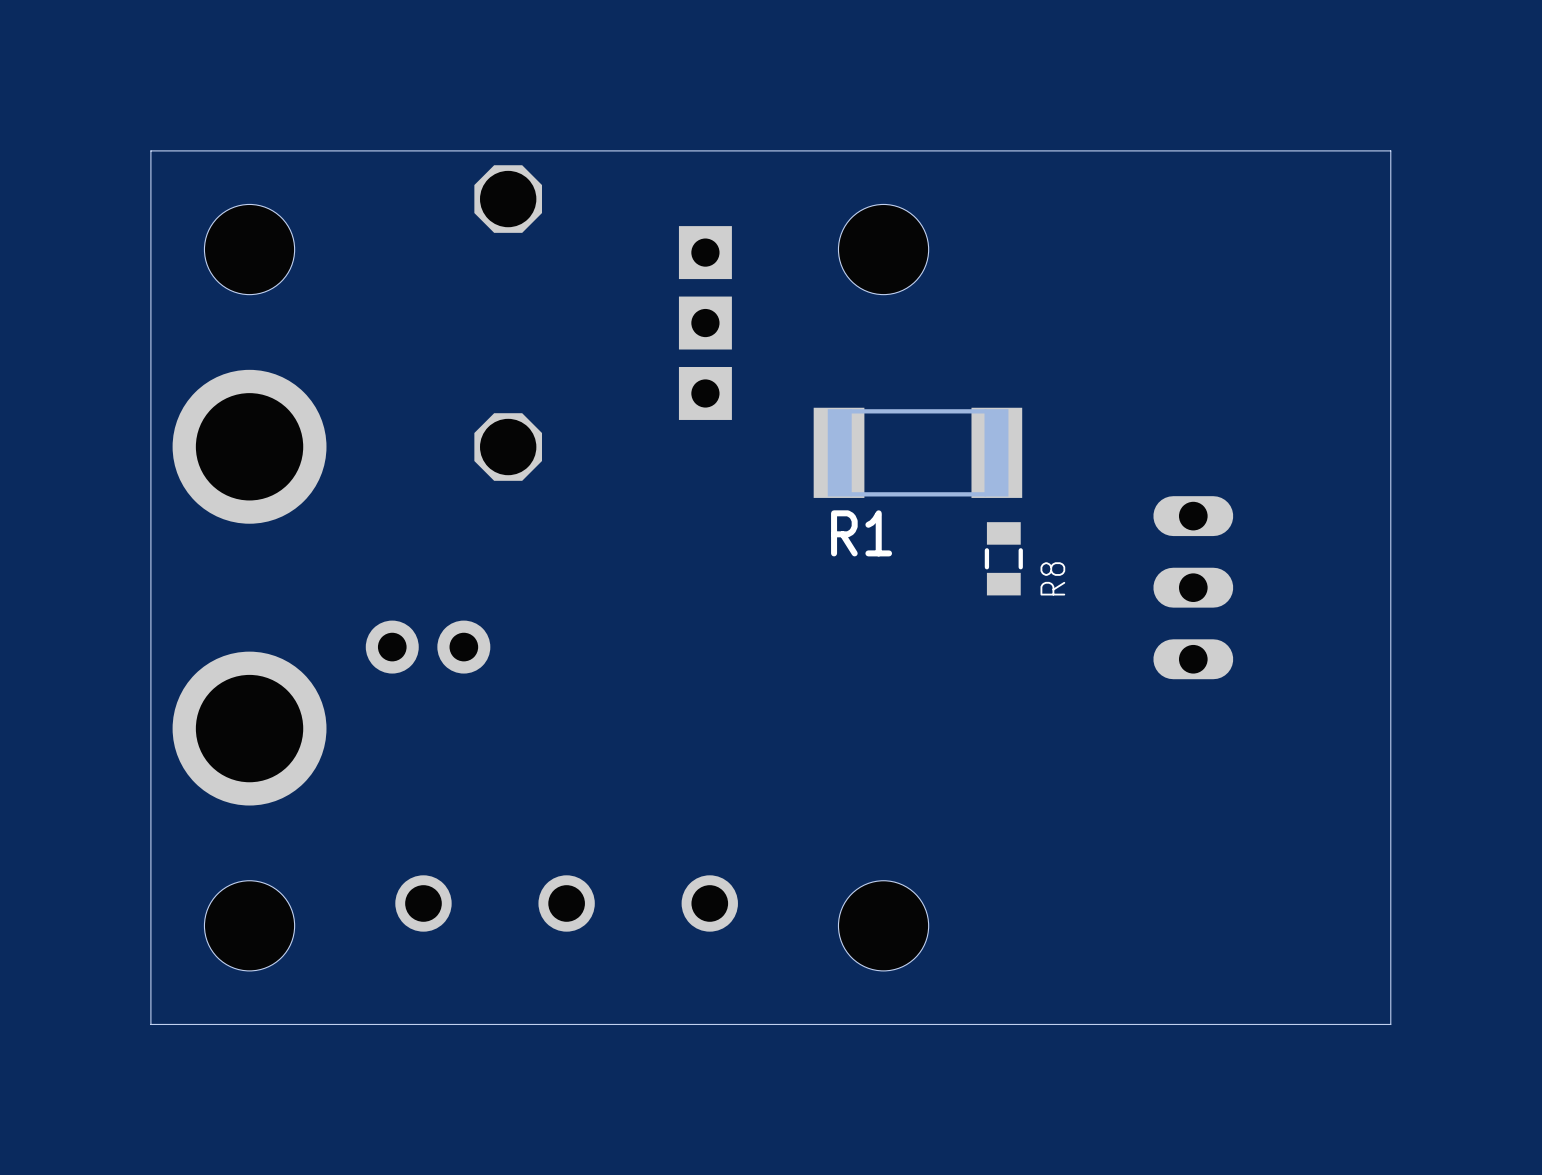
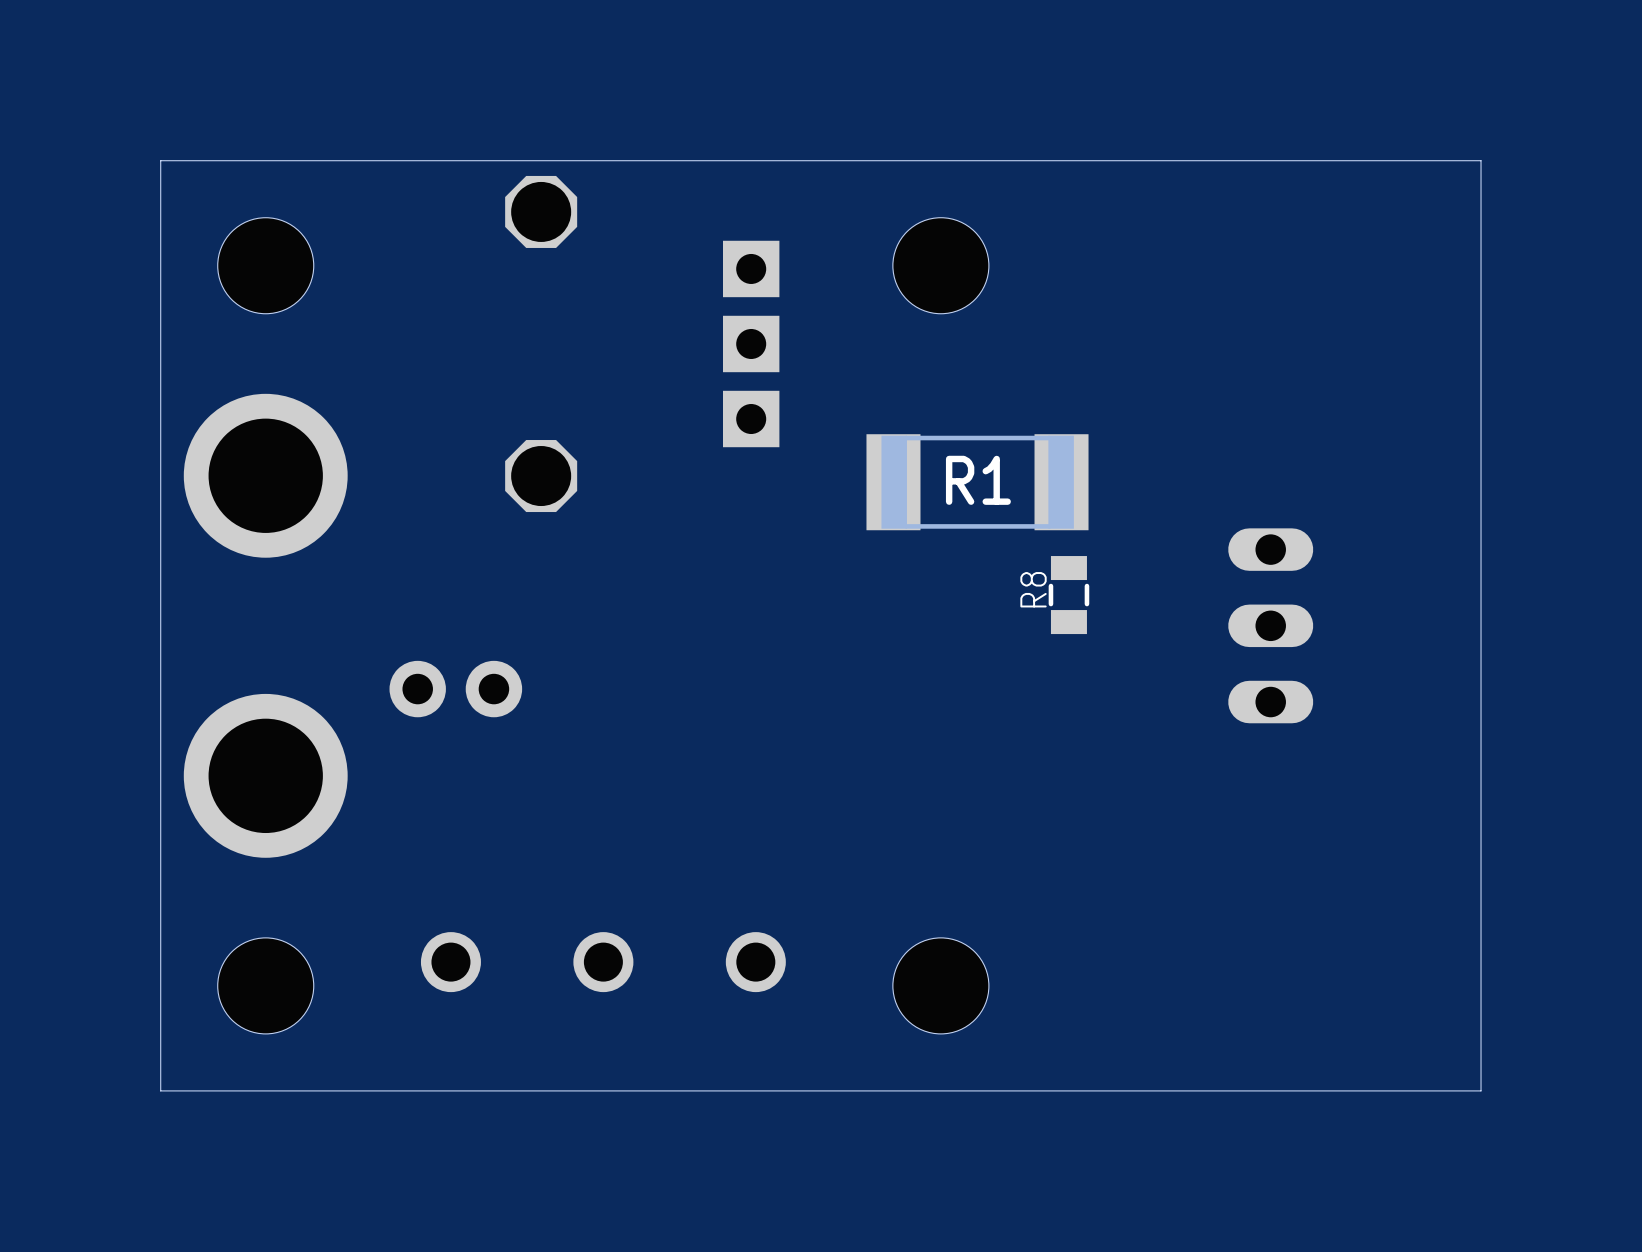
R1 name position: R1 (861, 533) -> R1 (978, 480)
R8 name position: R8 (1052, 578) -> R8 (1033, 589)

